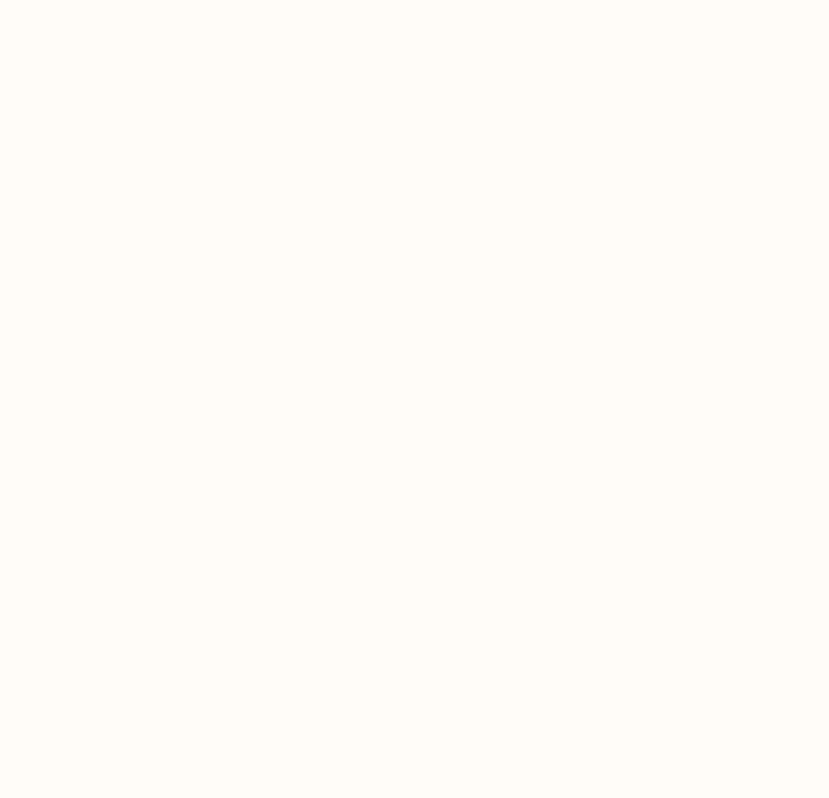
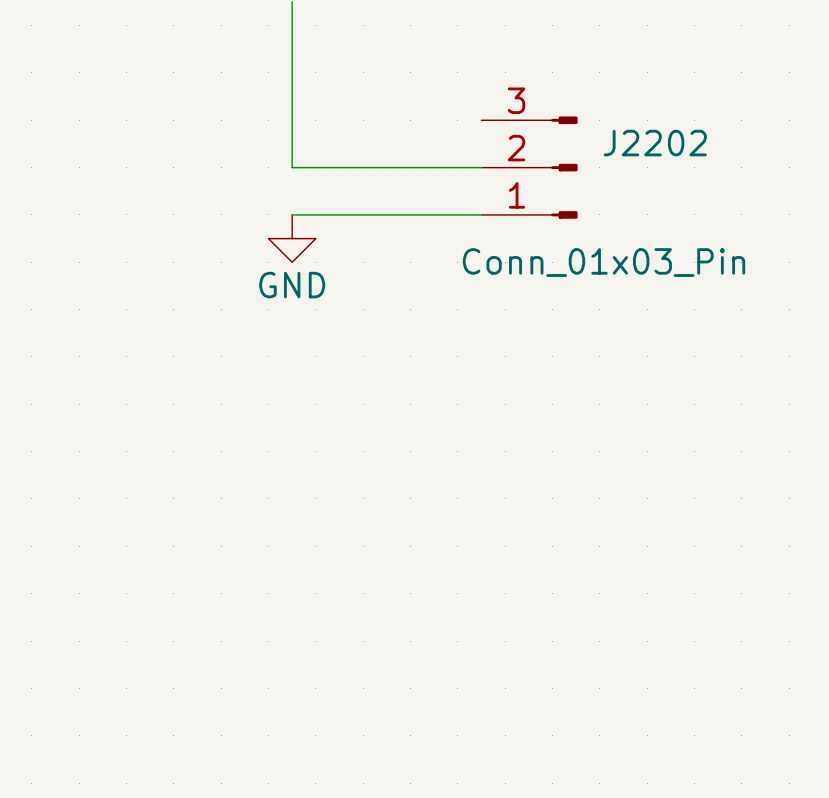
wire: none -> (292, 1) (292, 167) (481, 167)
J2202: none -> Conn_01x03_Pin (529, 167)
wire: none -> (292, 214) (481, 214)
power symbol: none -> GND (292, 238)

